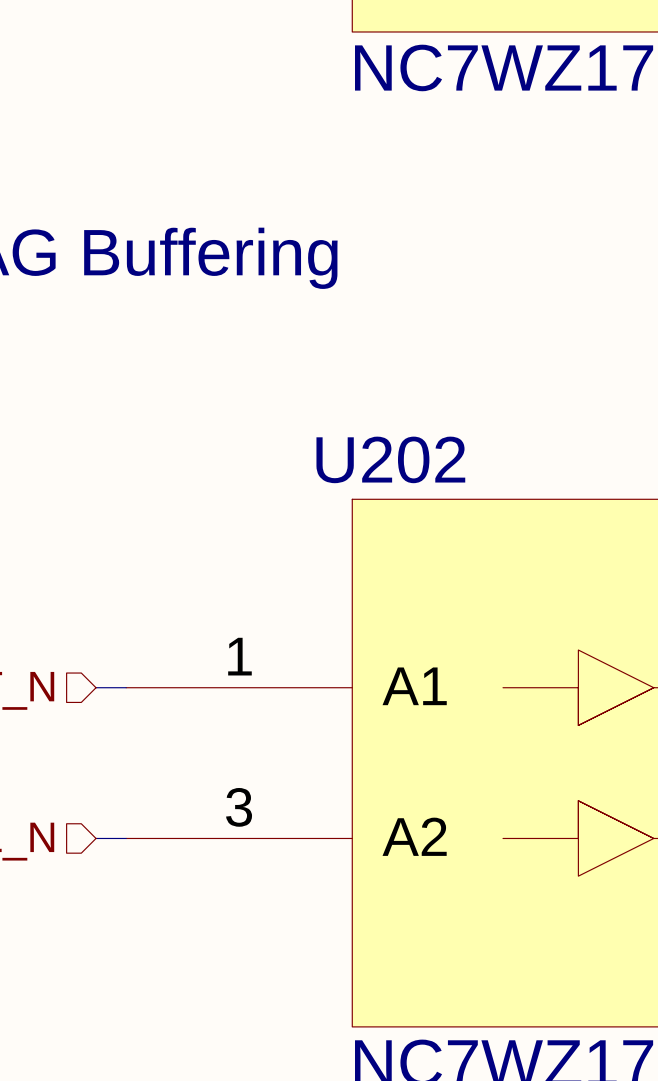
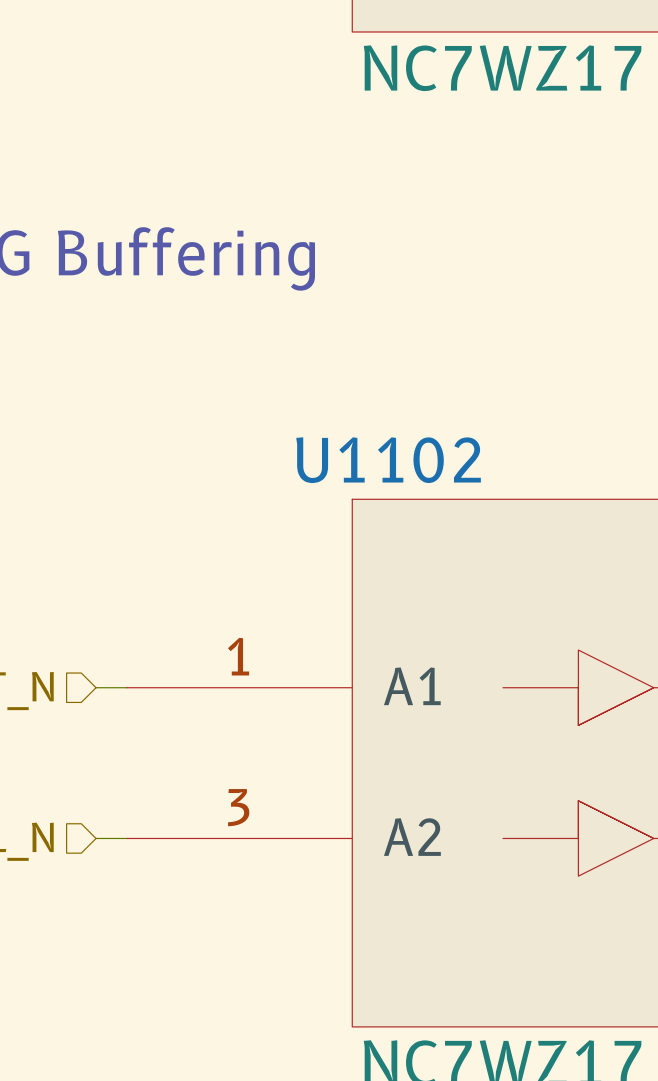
U202 name: U202 (390, 459) -> U1102 (388, 460)

